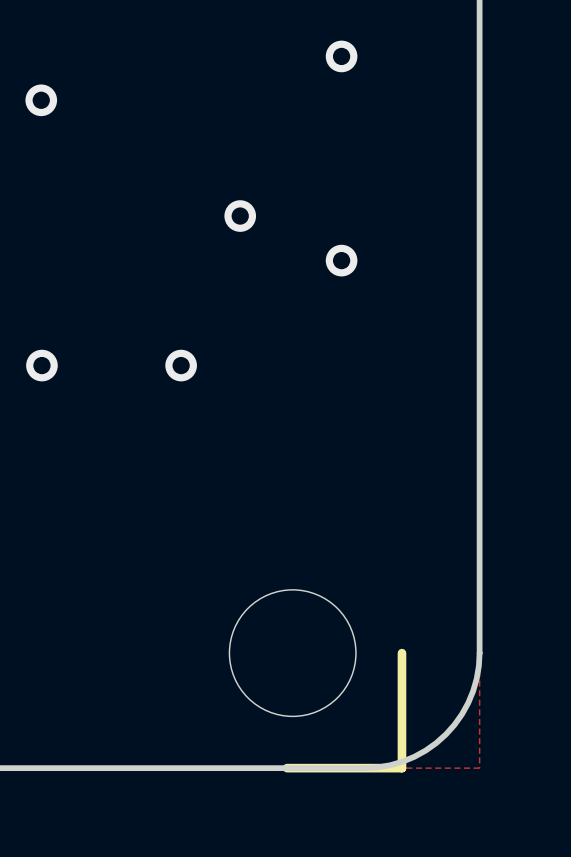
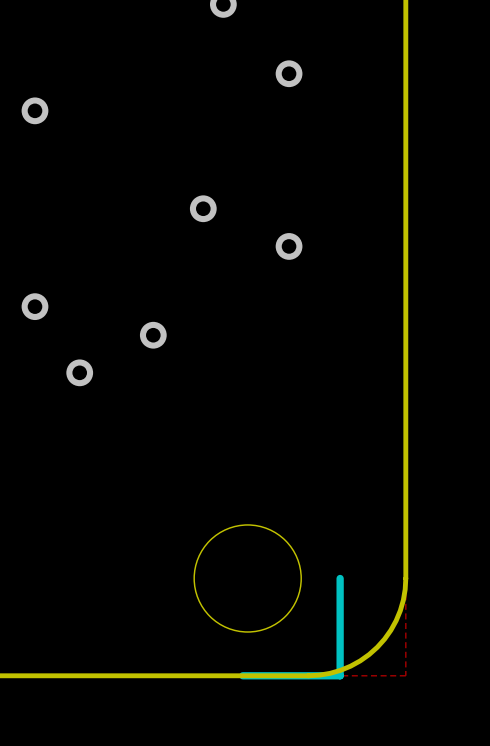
via: none -> (34, 306)
via: (41, 365) -> none
via: none -> (79, 372)

